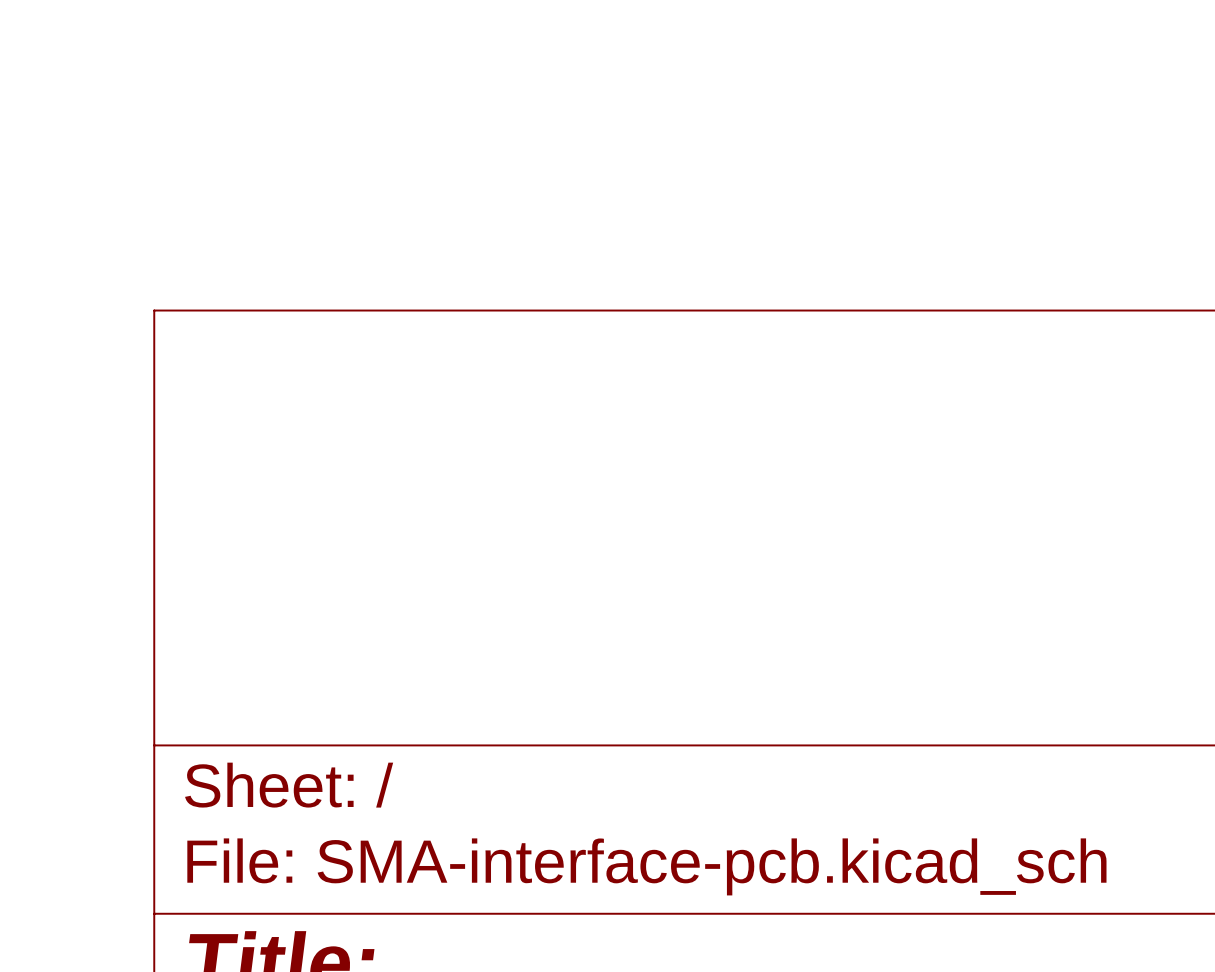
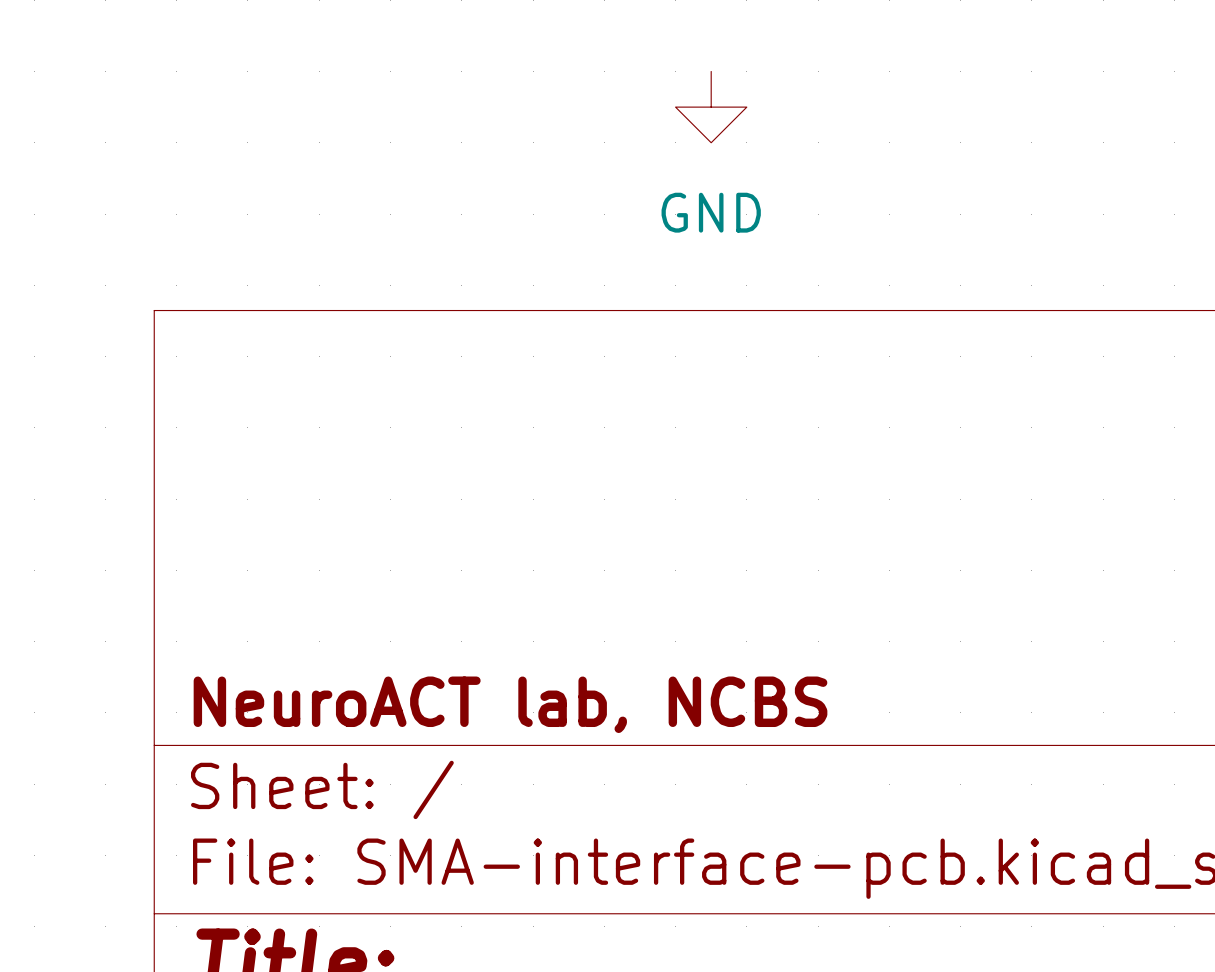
power symbol: none -> GND (711, 107)
title block: none -> NeuroACT lab, NCBS (510, 704)

